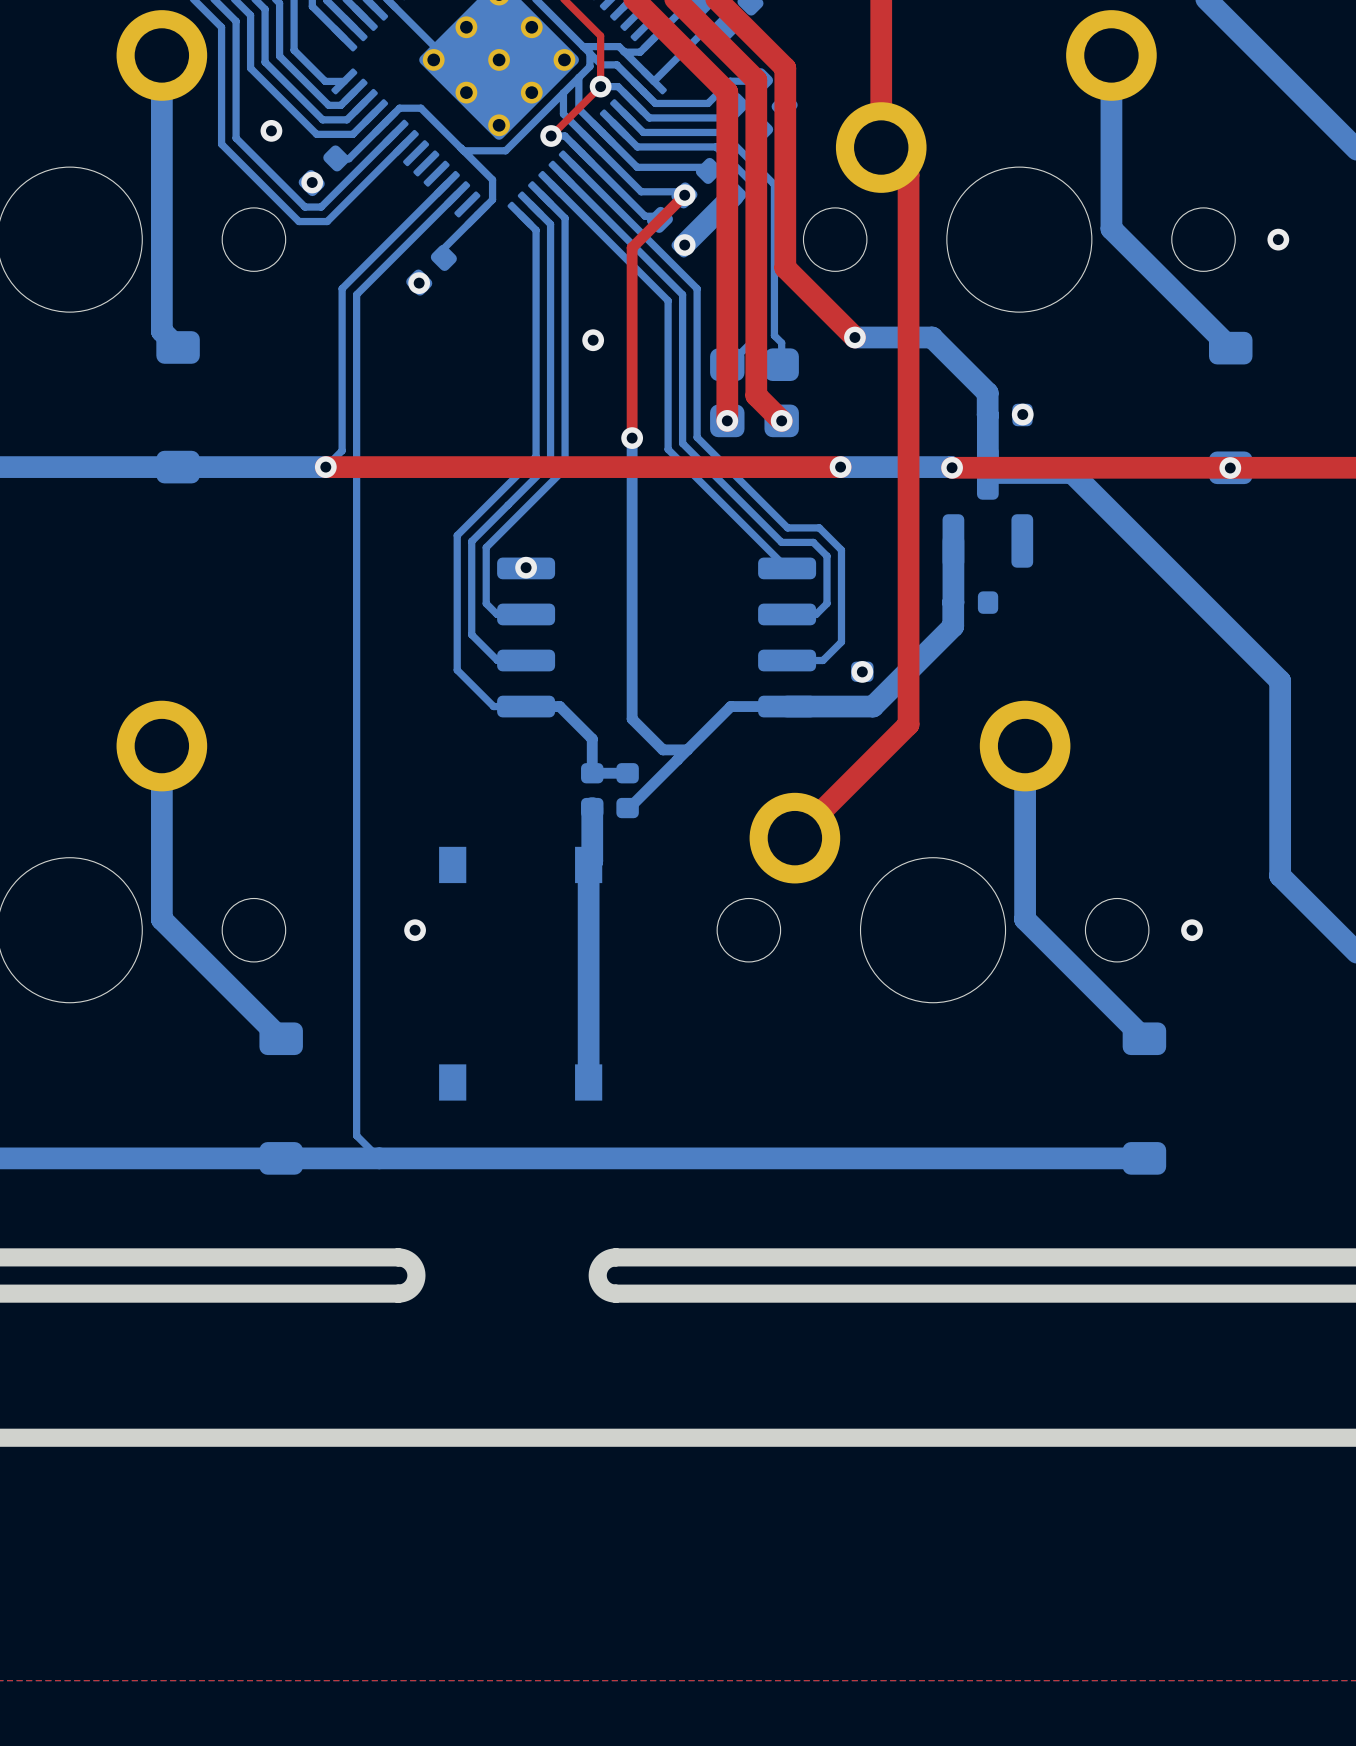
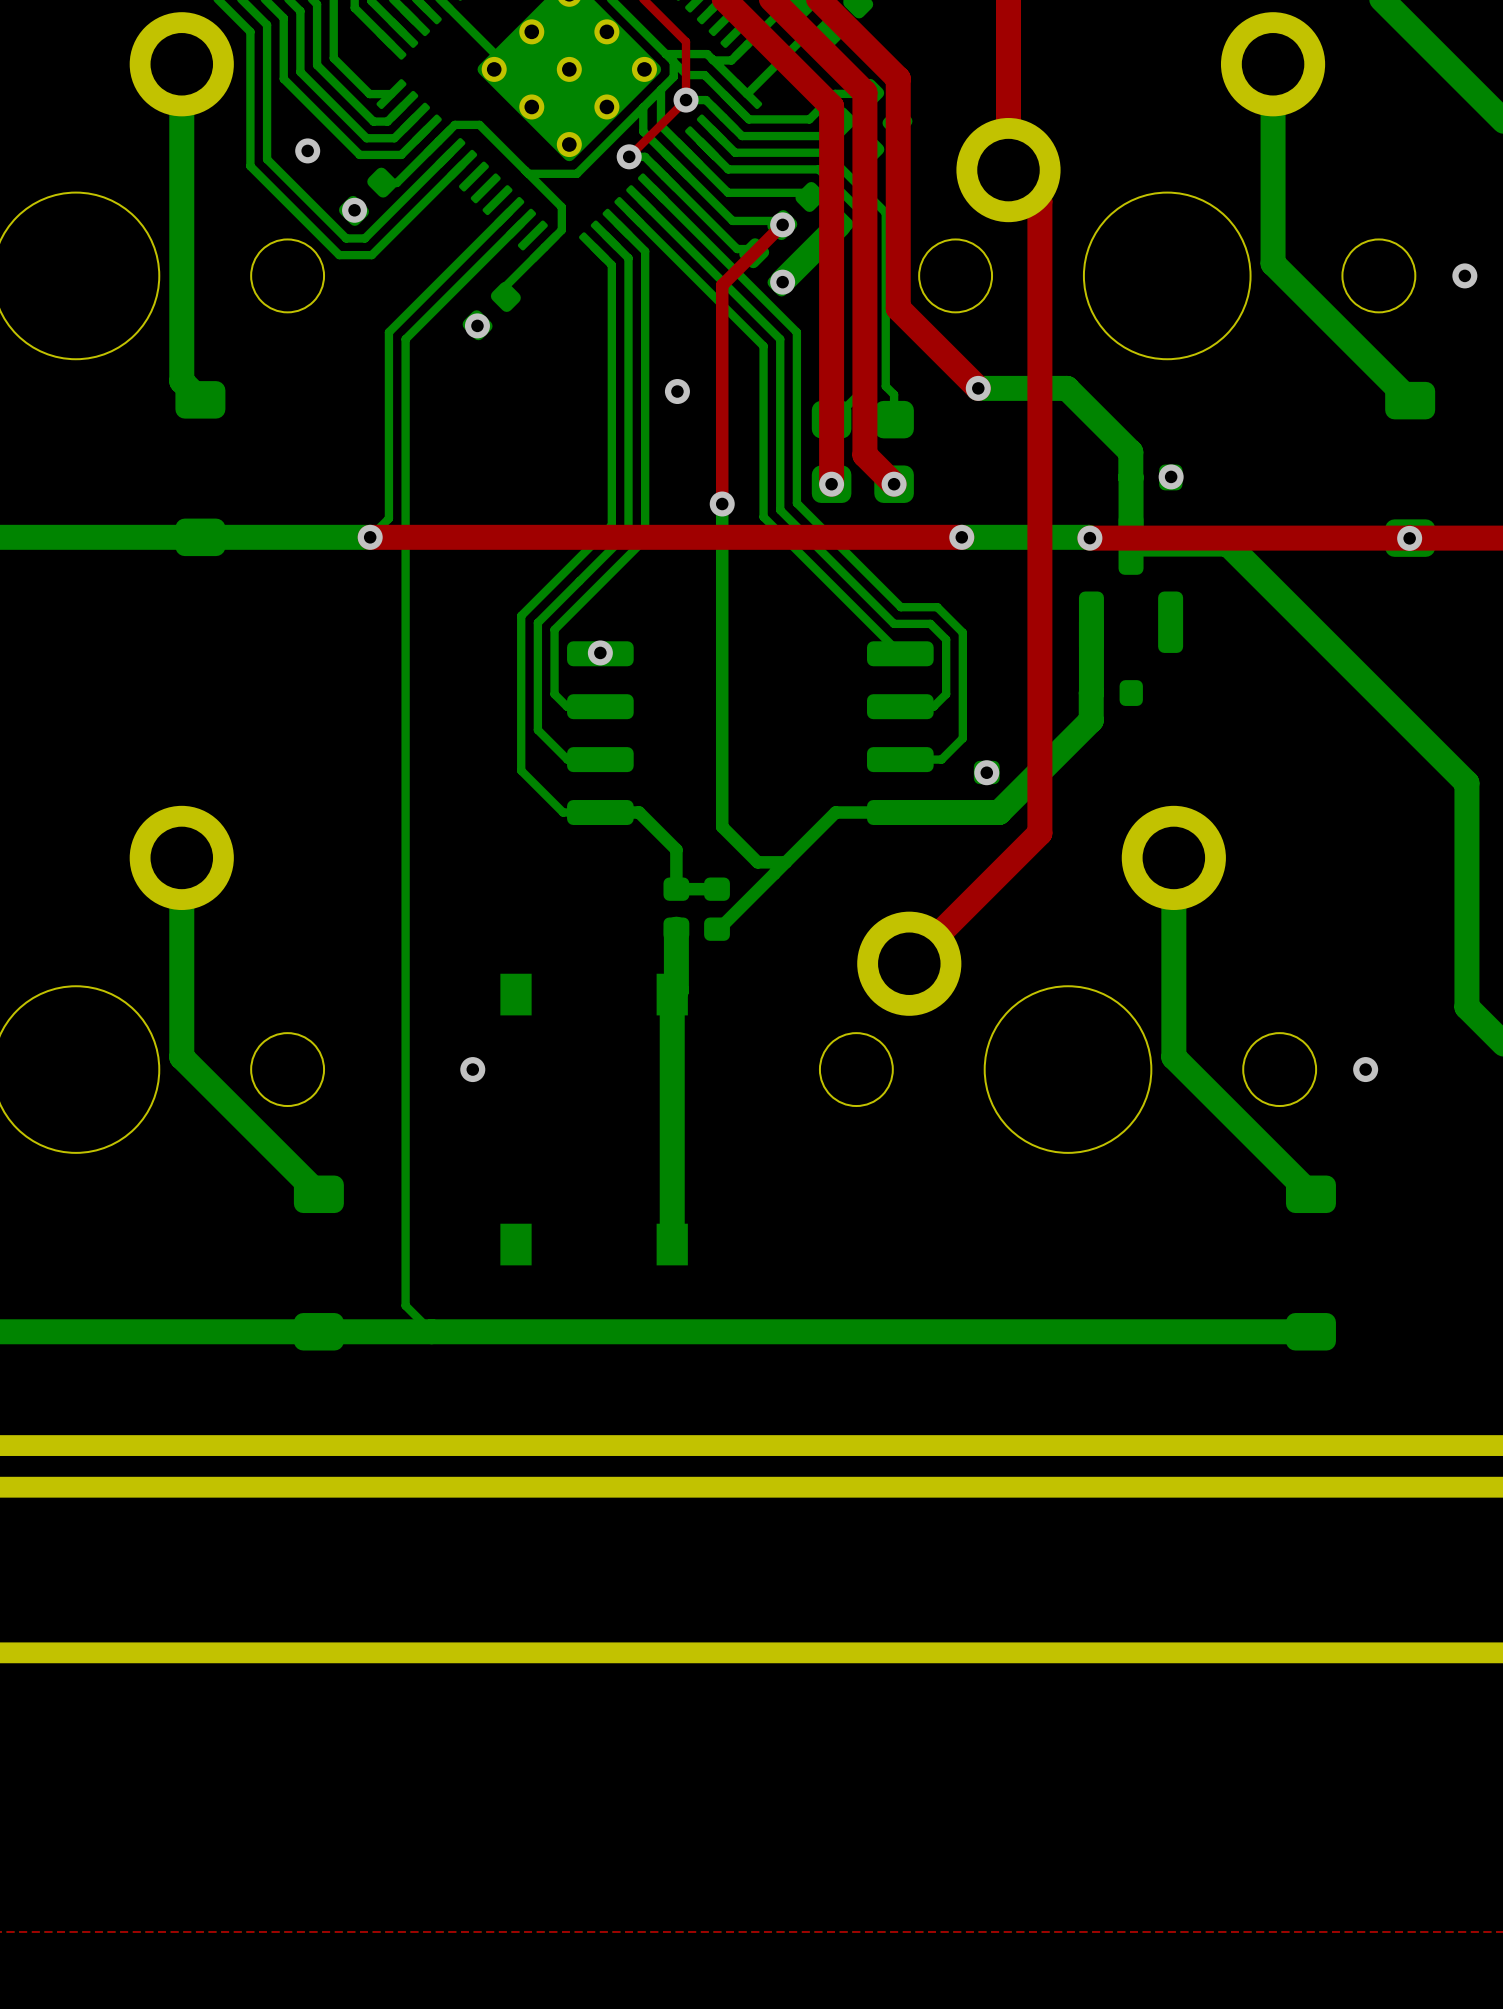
board edge: (398, 1257) (411, 1262) (416, 1275) (411, 1288) (398, 1293) -> (453, 1445) (703, 1445)
board edge: (615, 1257) (603, 1262) (597, 1275) (603, 1288) (615, 1293) -> (453, 1487) (703, 1487)

